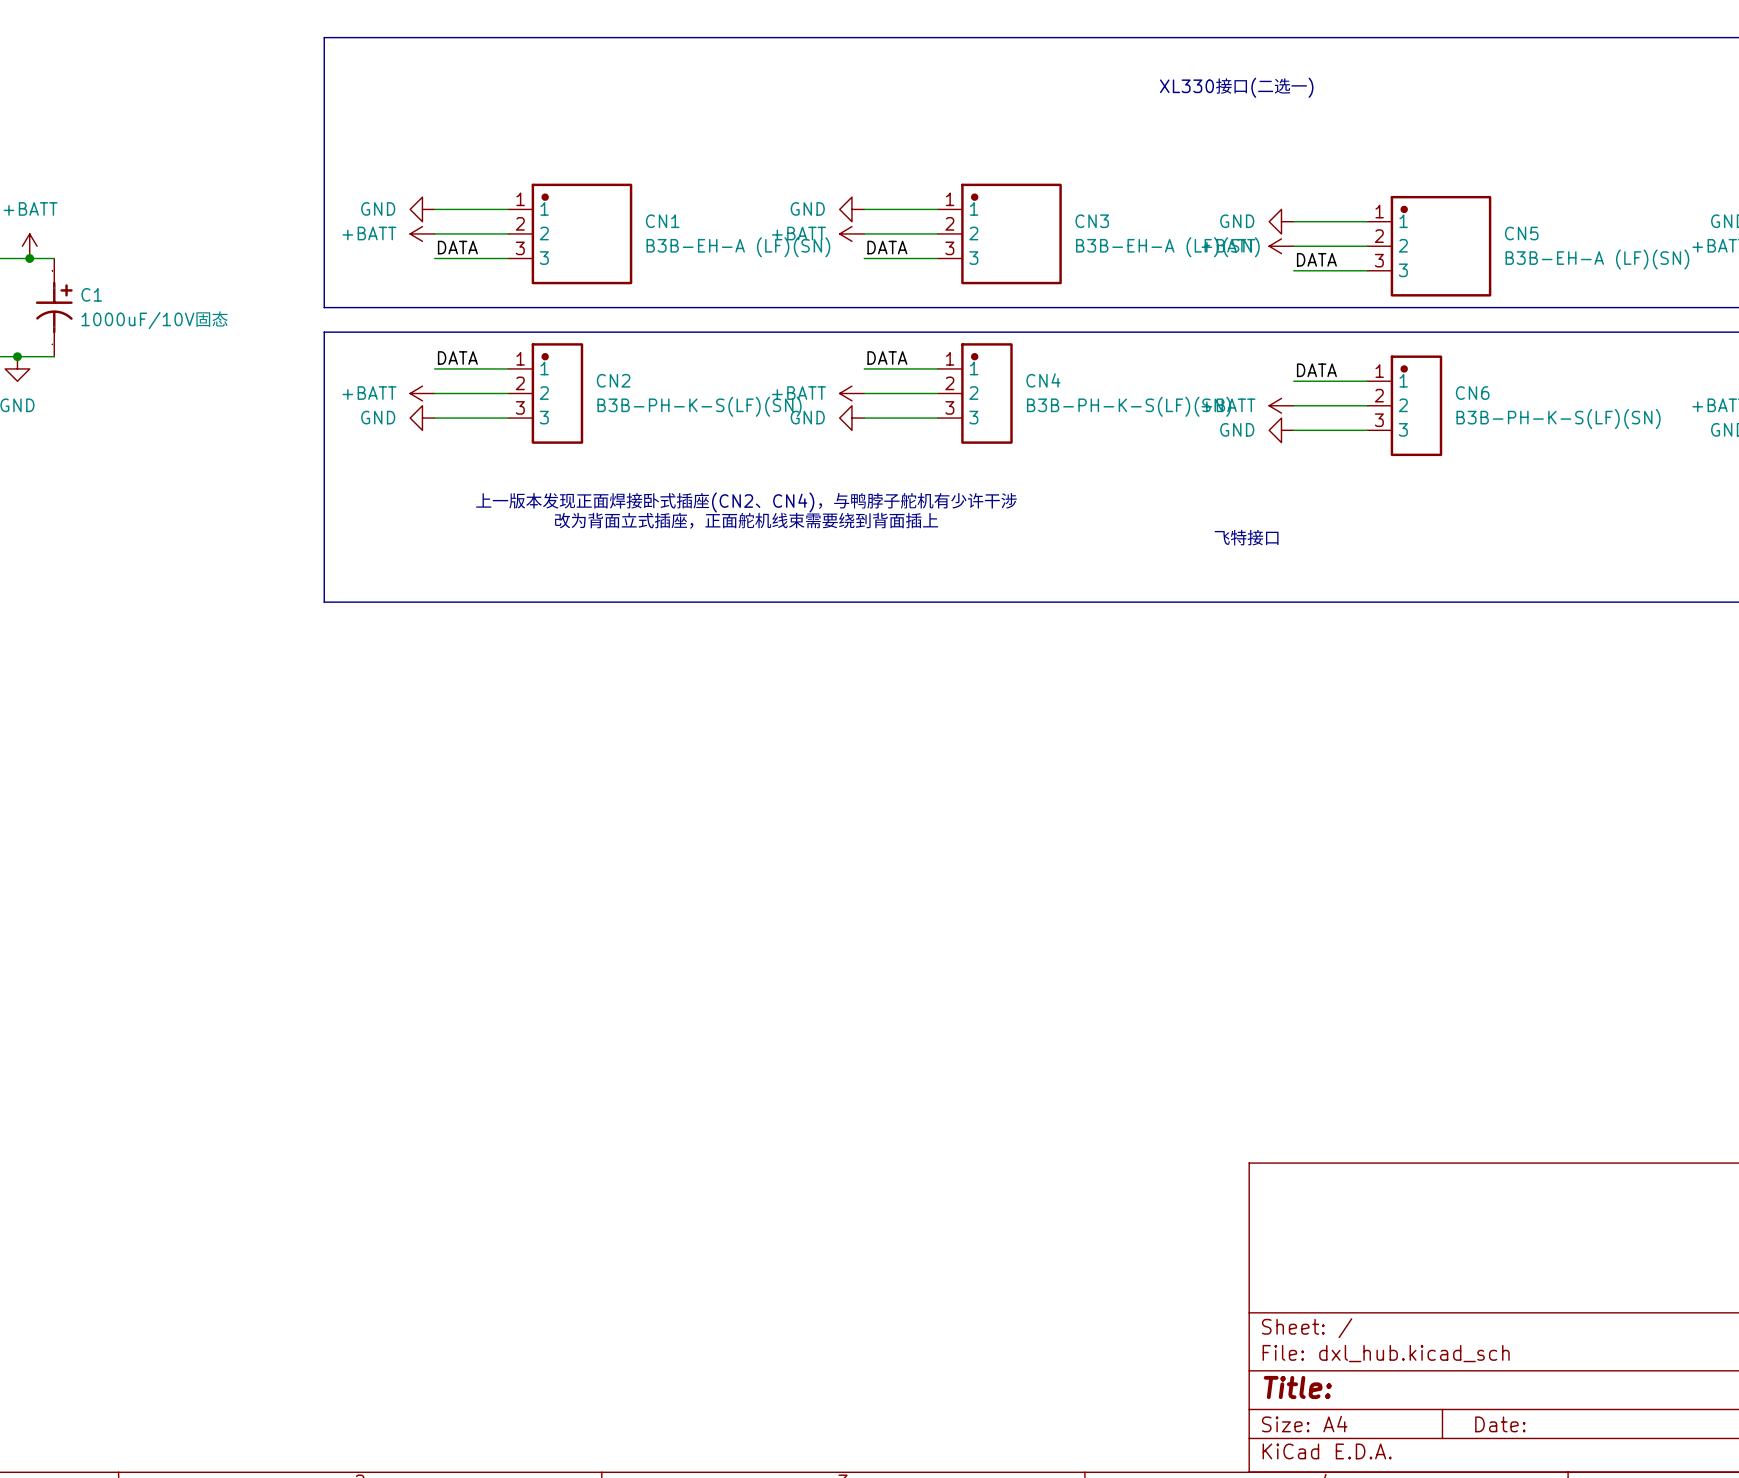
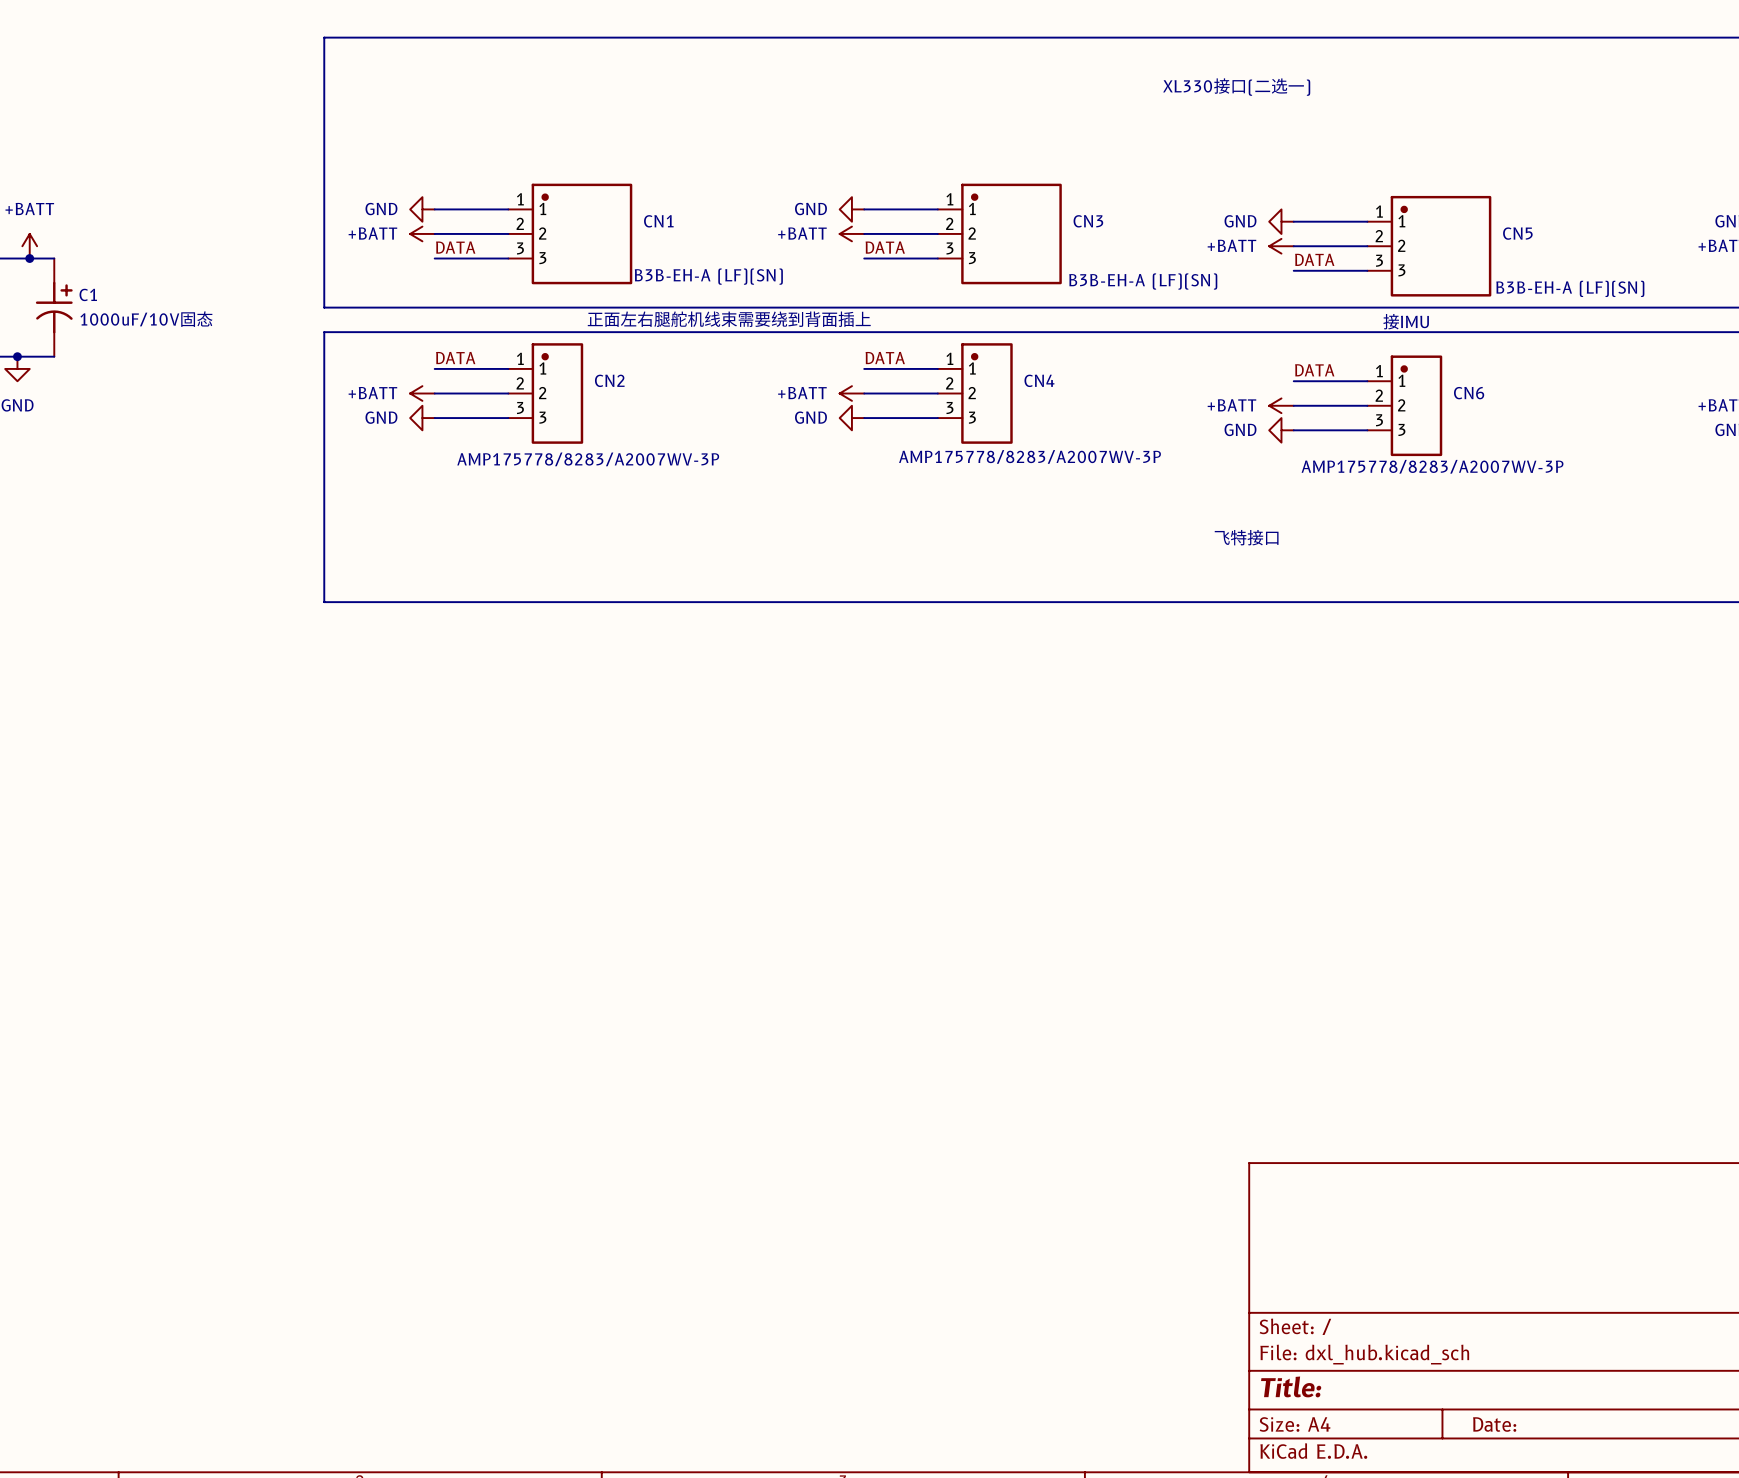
CN1 value position: B3B-EH-A (LF)(SN) (738, 247) -> B3B-EH-A (LF)(SN) (708, 276)
CN3 value position: B3B-EH-A (LF)(SN) (1167, 247) -> B3B-EH-A (LF)(SN) (1143, 281)
CN5 value position: B3B-EH-A (LF)(SN) (1597, 259) -> B3B-EH-A (LF)(SN) (1570, 288)
text: none -> 正面左右腿舵机线束需要绕到背面插上 (729, 319)
text: none -> 接IMU (1406, 321)
CN2 value: B3B-PH-K-S(LF)(SN) (699, 406) -> AMP175778/8283/A2007WV-3P (588, 459)
CN4 value: B3B-PH-K-S(LF)(SN) (1129, 406) -> AMP175778/8283/A2007WV-3P (1030, 456)
CN6 value: B3B-PH-K-S(LF)(SN) (1558, 419) -> AMP175778/8283/A2007WV-3P (1432, 466)
text: 上一版本发现正面焊接卧式插座(CN2、CN4)，与鸭脖子舵机有少许干涉 (746, 502) -> none
text: 改为背面立式插座，正面舵机线束需要绕到背面插上 (746, 520) -> none

